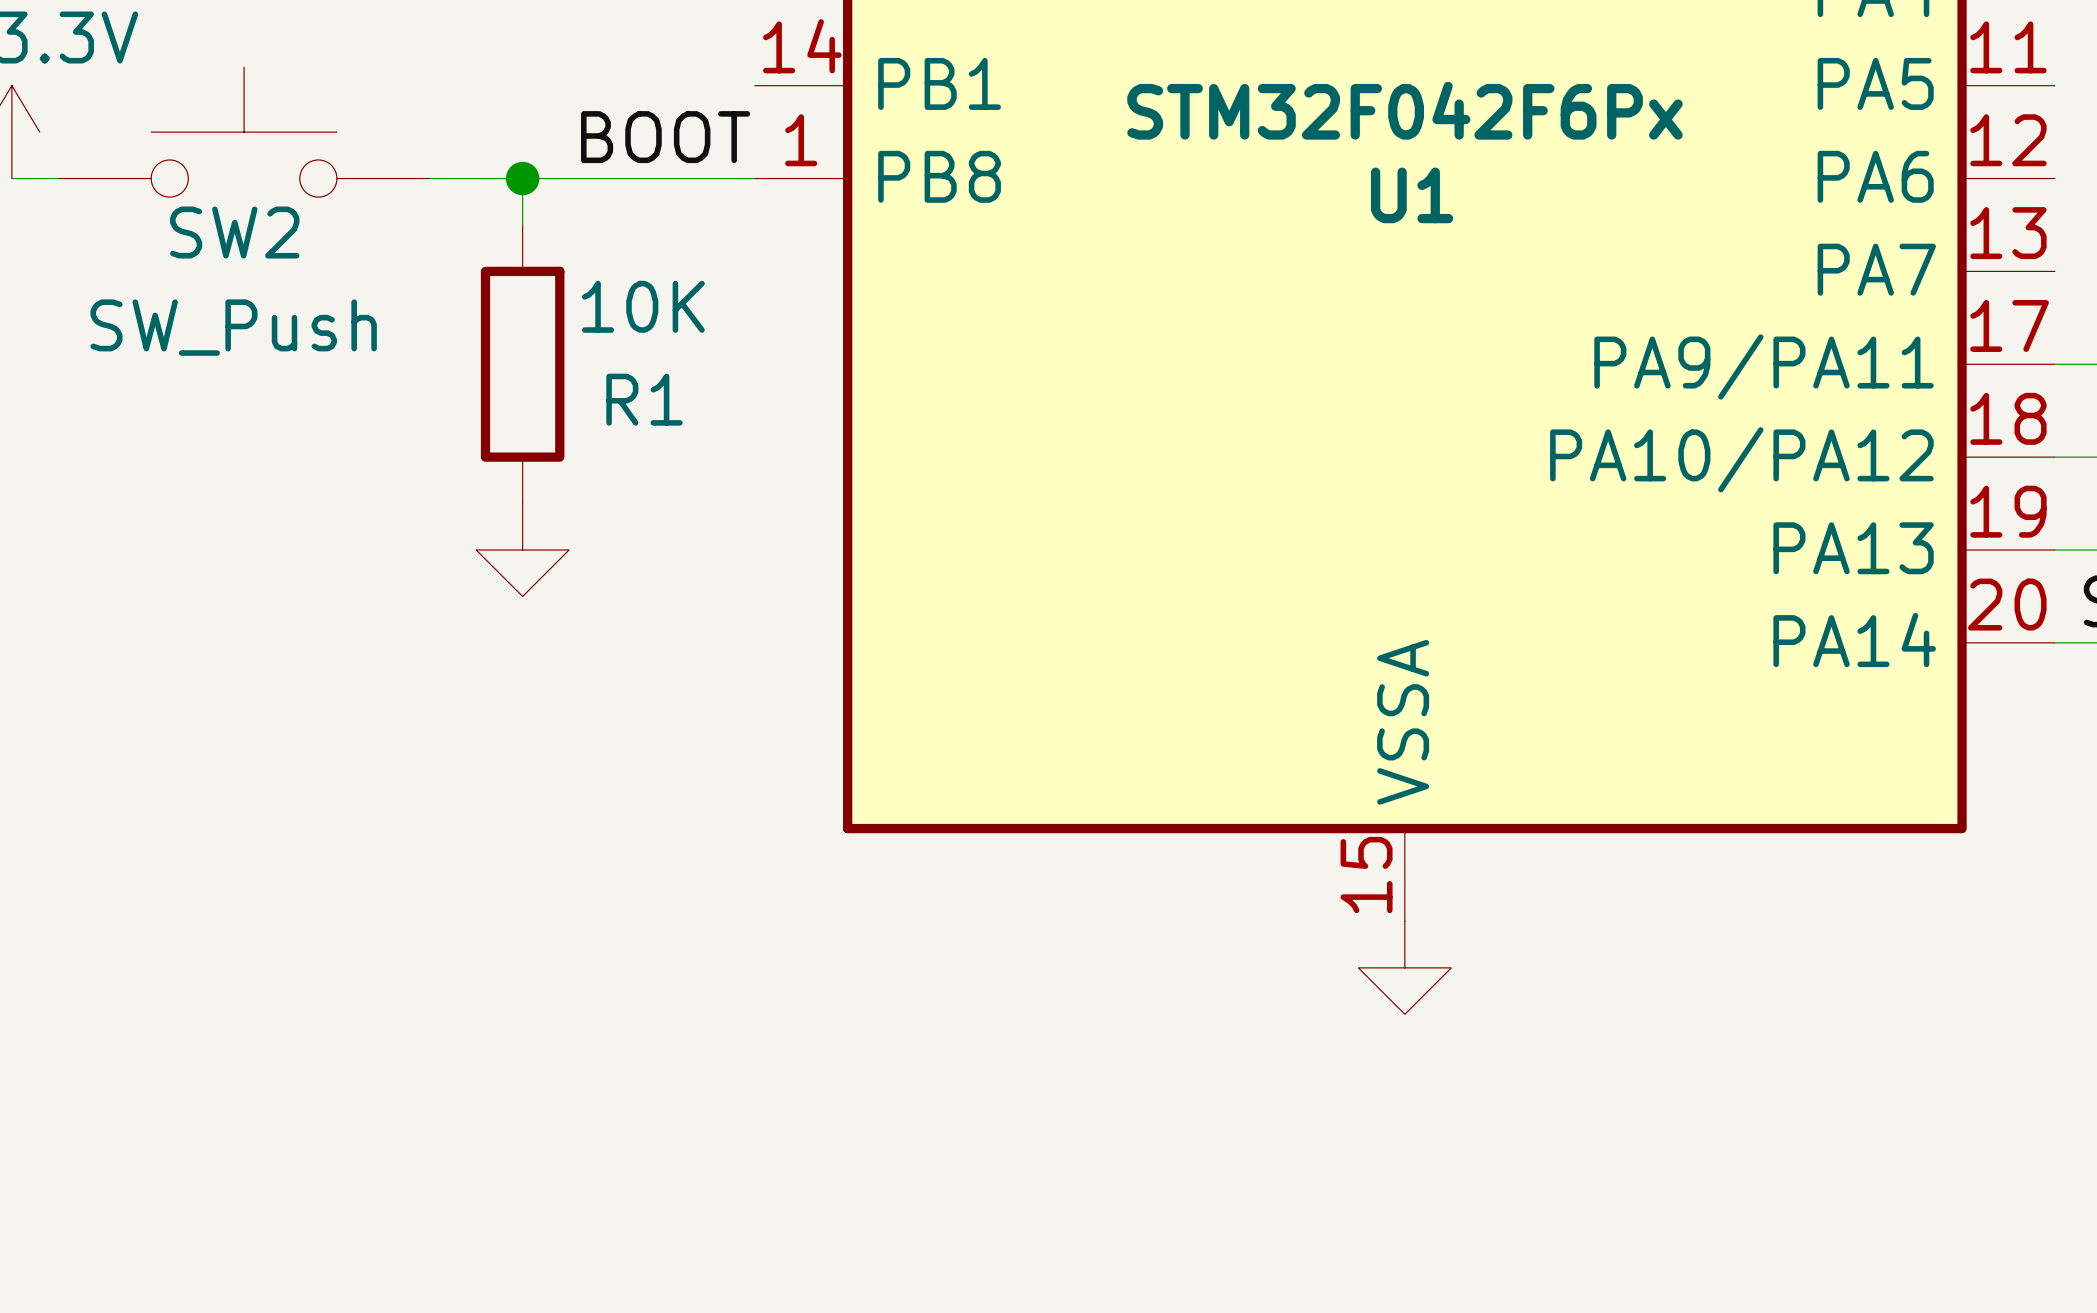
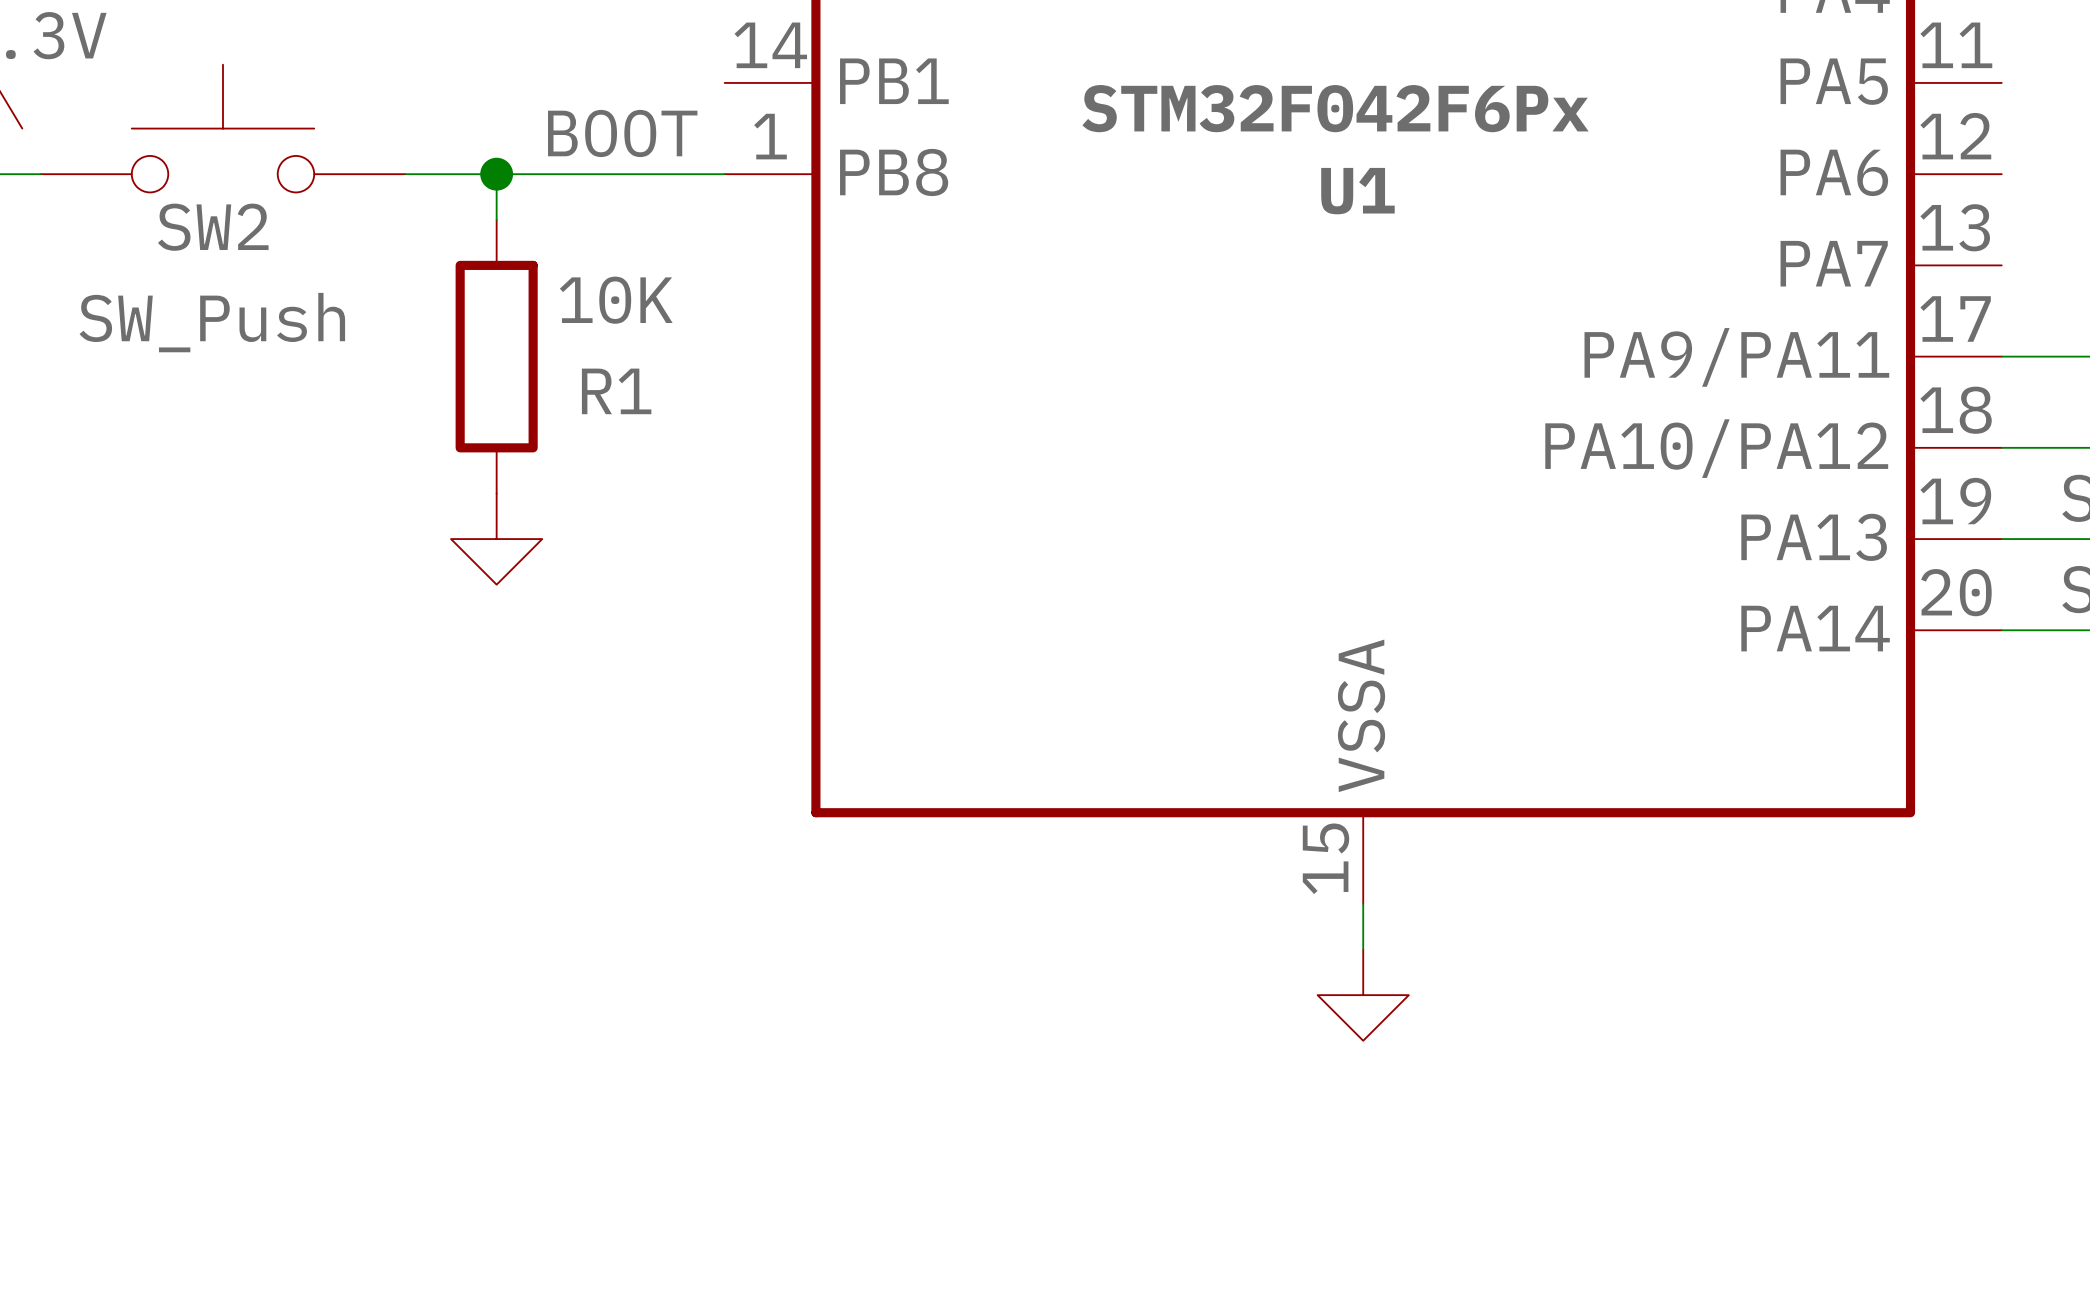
power symbol position: (1404, 967) -> (1363, 995)

